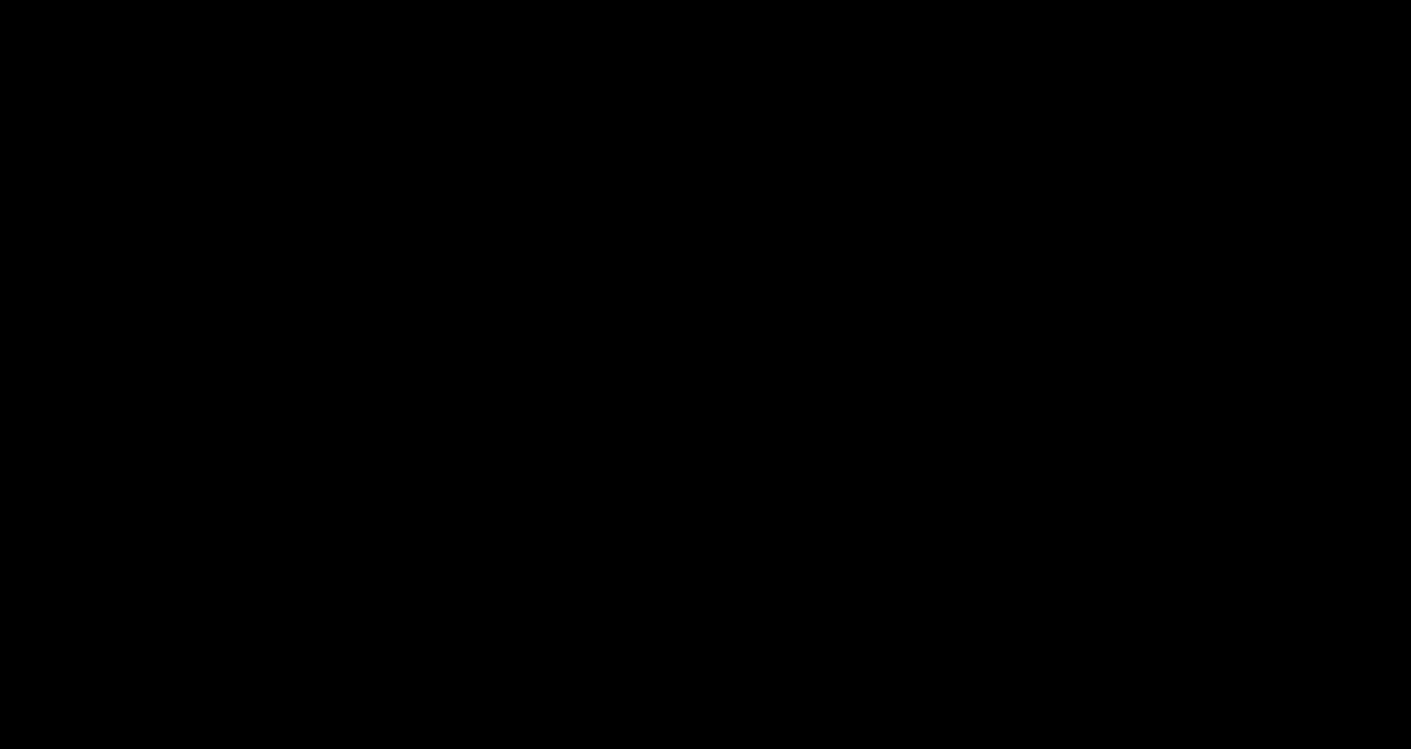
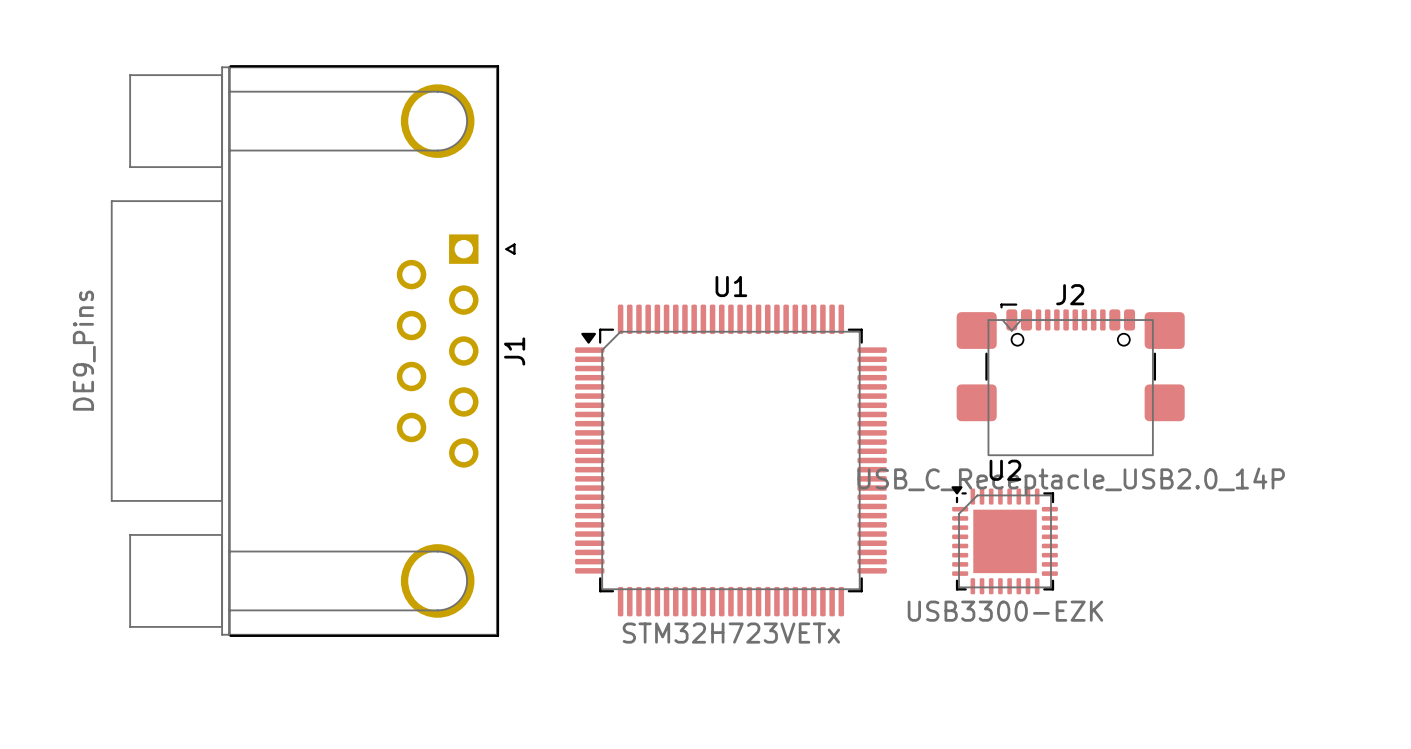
J1: none -> DE9_Pins (313, 351)
J2: none -> USB_C_Receptacle_USB2.0_14P (1070, 379)
U1: none -> STM32H723VETx (730, 460)
U2: none -> USB3300-EZK (1004, 540)

